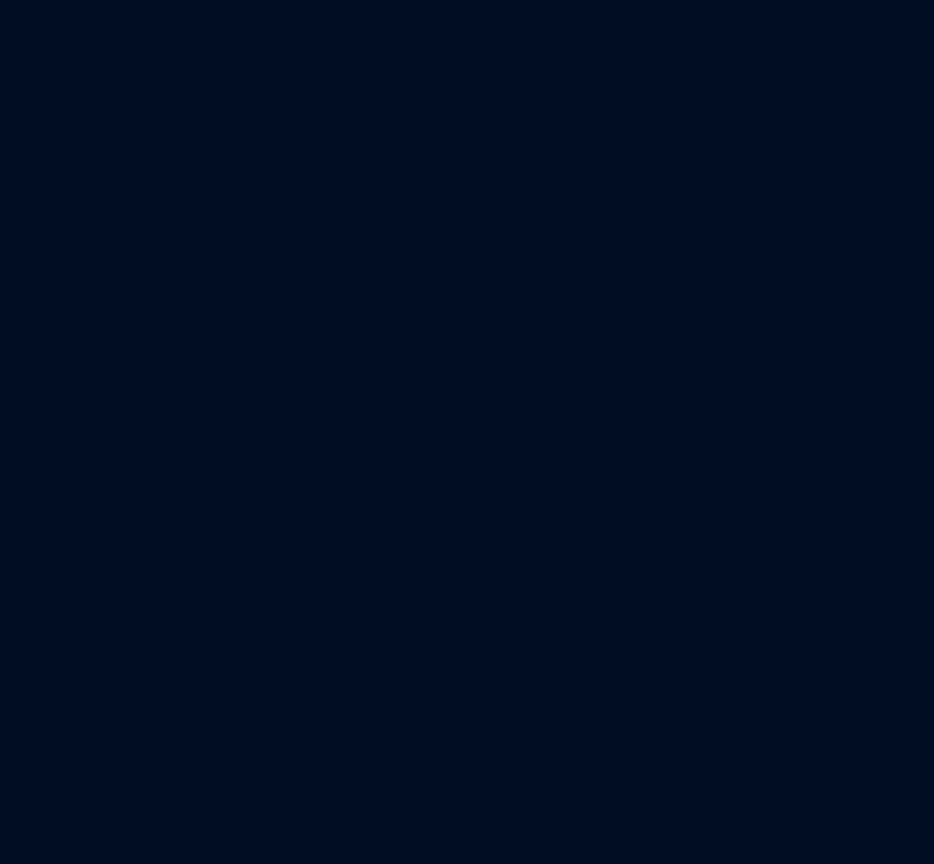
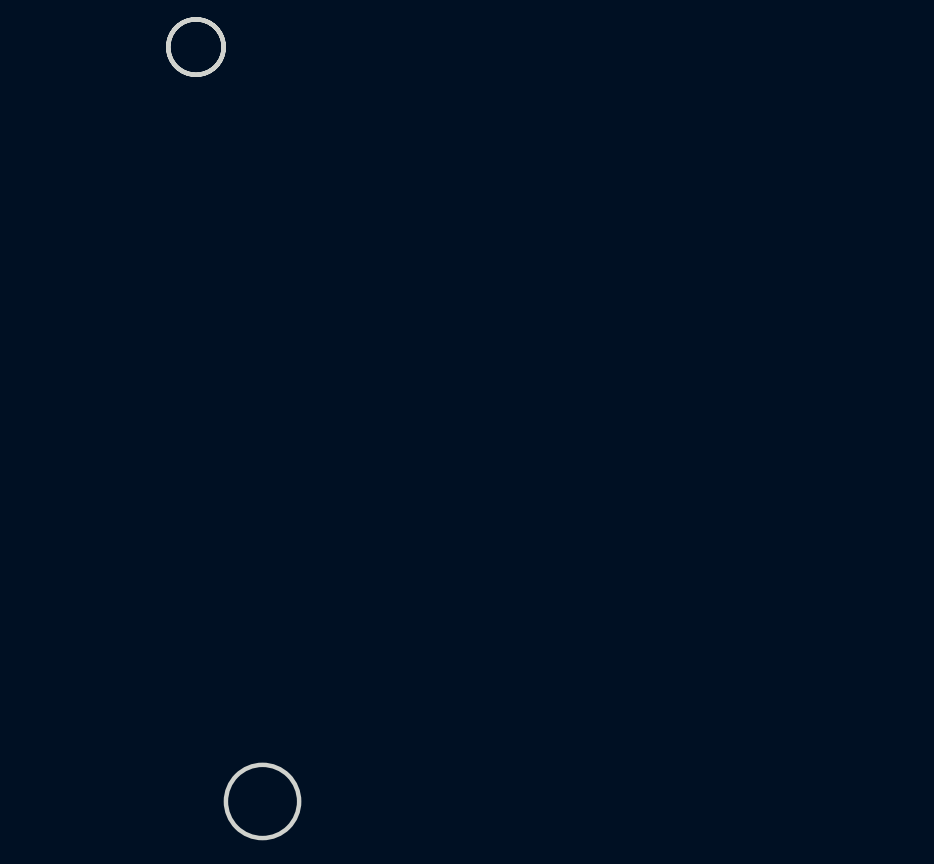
round board edge: none -> [166, 17, 226, 78]
round board edge: none -> [223, 762, 302, 841]

